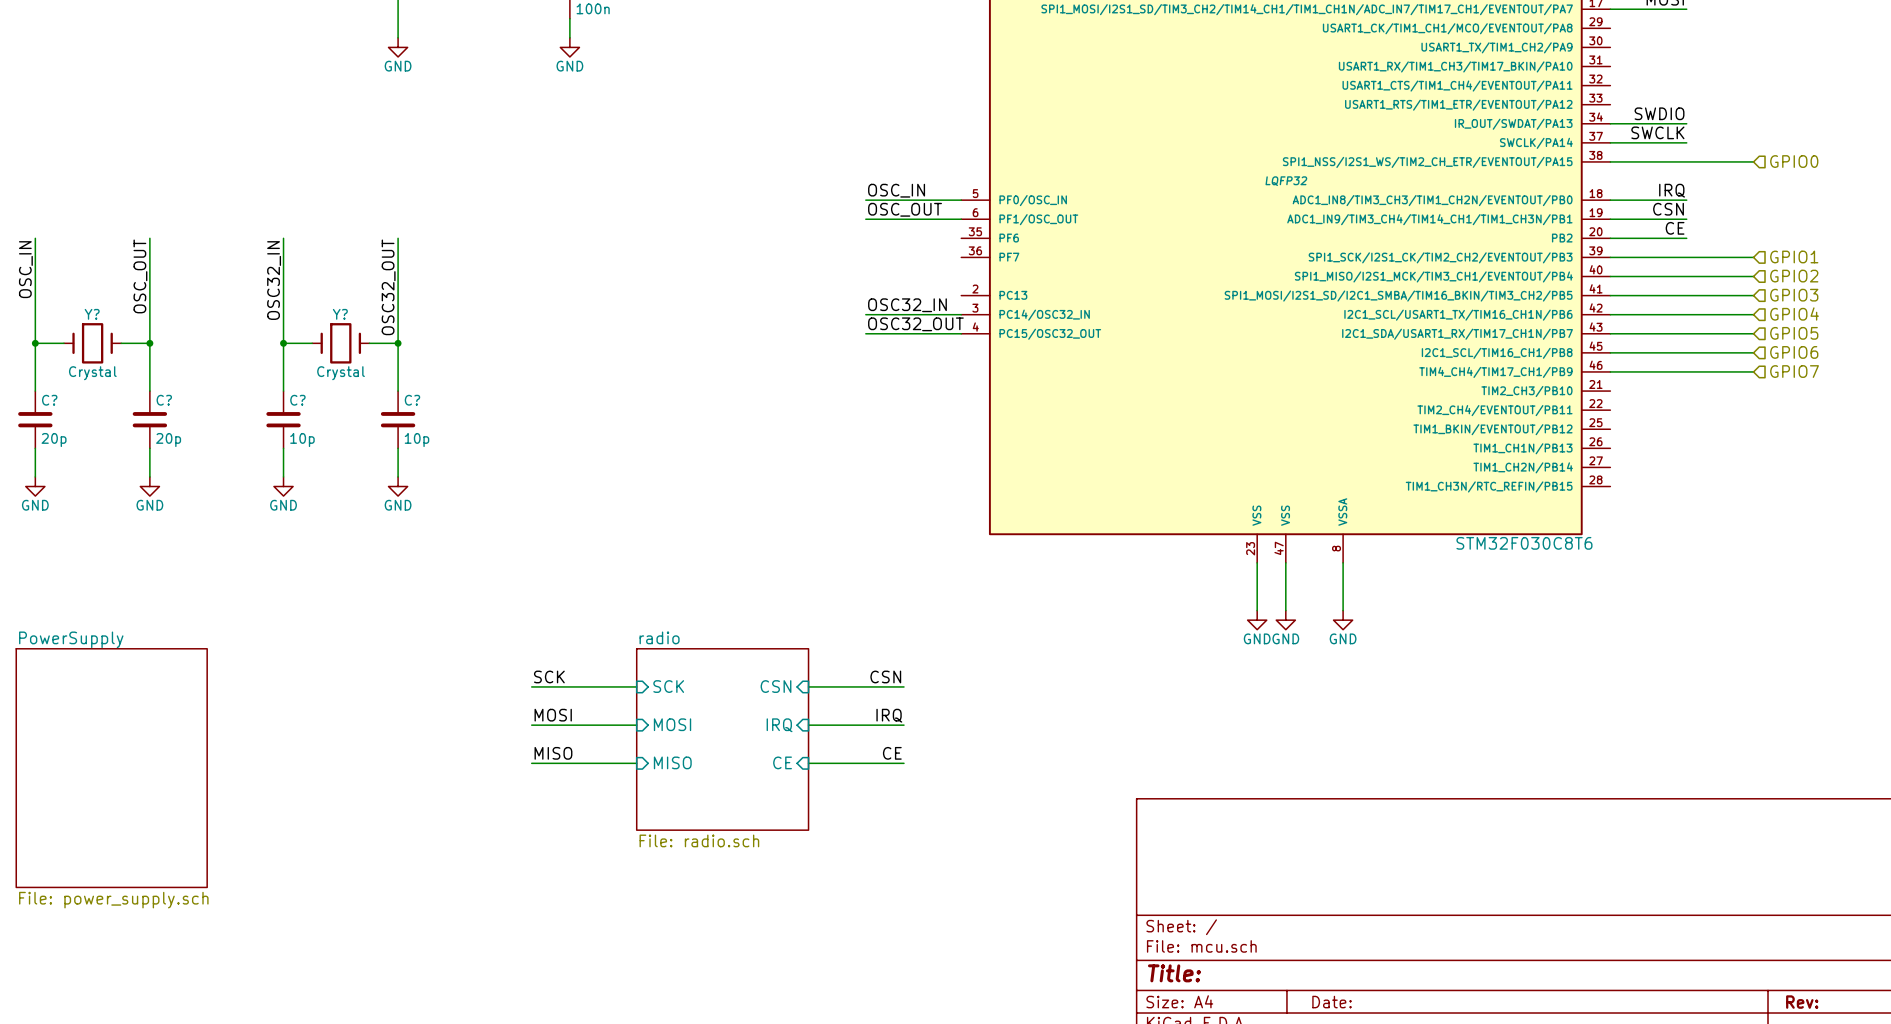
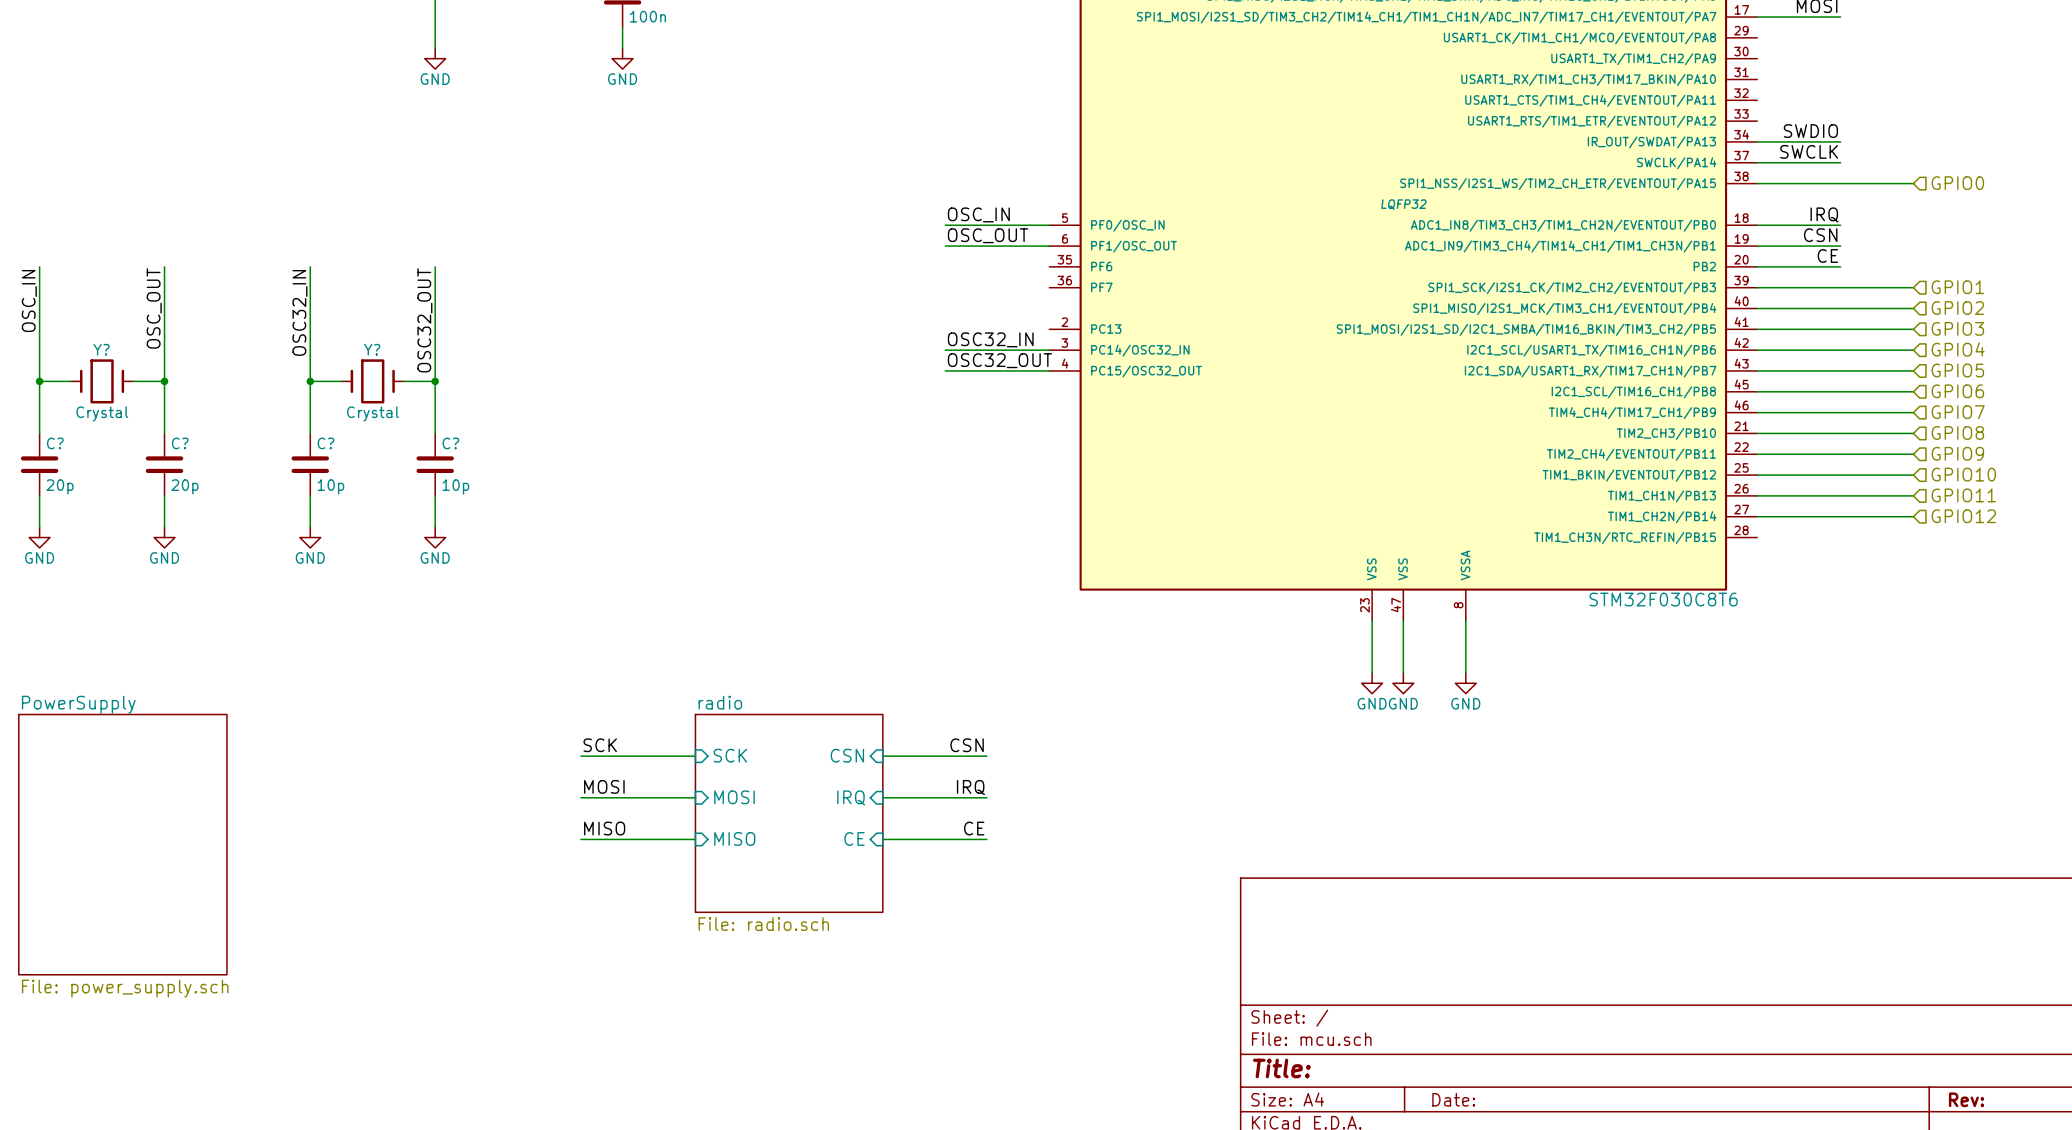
hierarchical label: none -> GPIO8 (1957, 432)
wire: none -> (1757, 433) (1913, 433)
hierarchical label: none -> GPIO9 (1957, 453)
wire: none -> (1757, 454) (1913, 454)
hierarchical label: none -> GPIO10 (1963, 474)
wire: none -> (1757, 475) (1913, 475)
hierarchical label: none -> GPIO11 (1963, 495)
wire: none -> (1757, 495) (1913, 495)
hierarchical label: none -> GPIO12 (1963, 516)
wire: none -> (1757, 516) (1913, 516)

